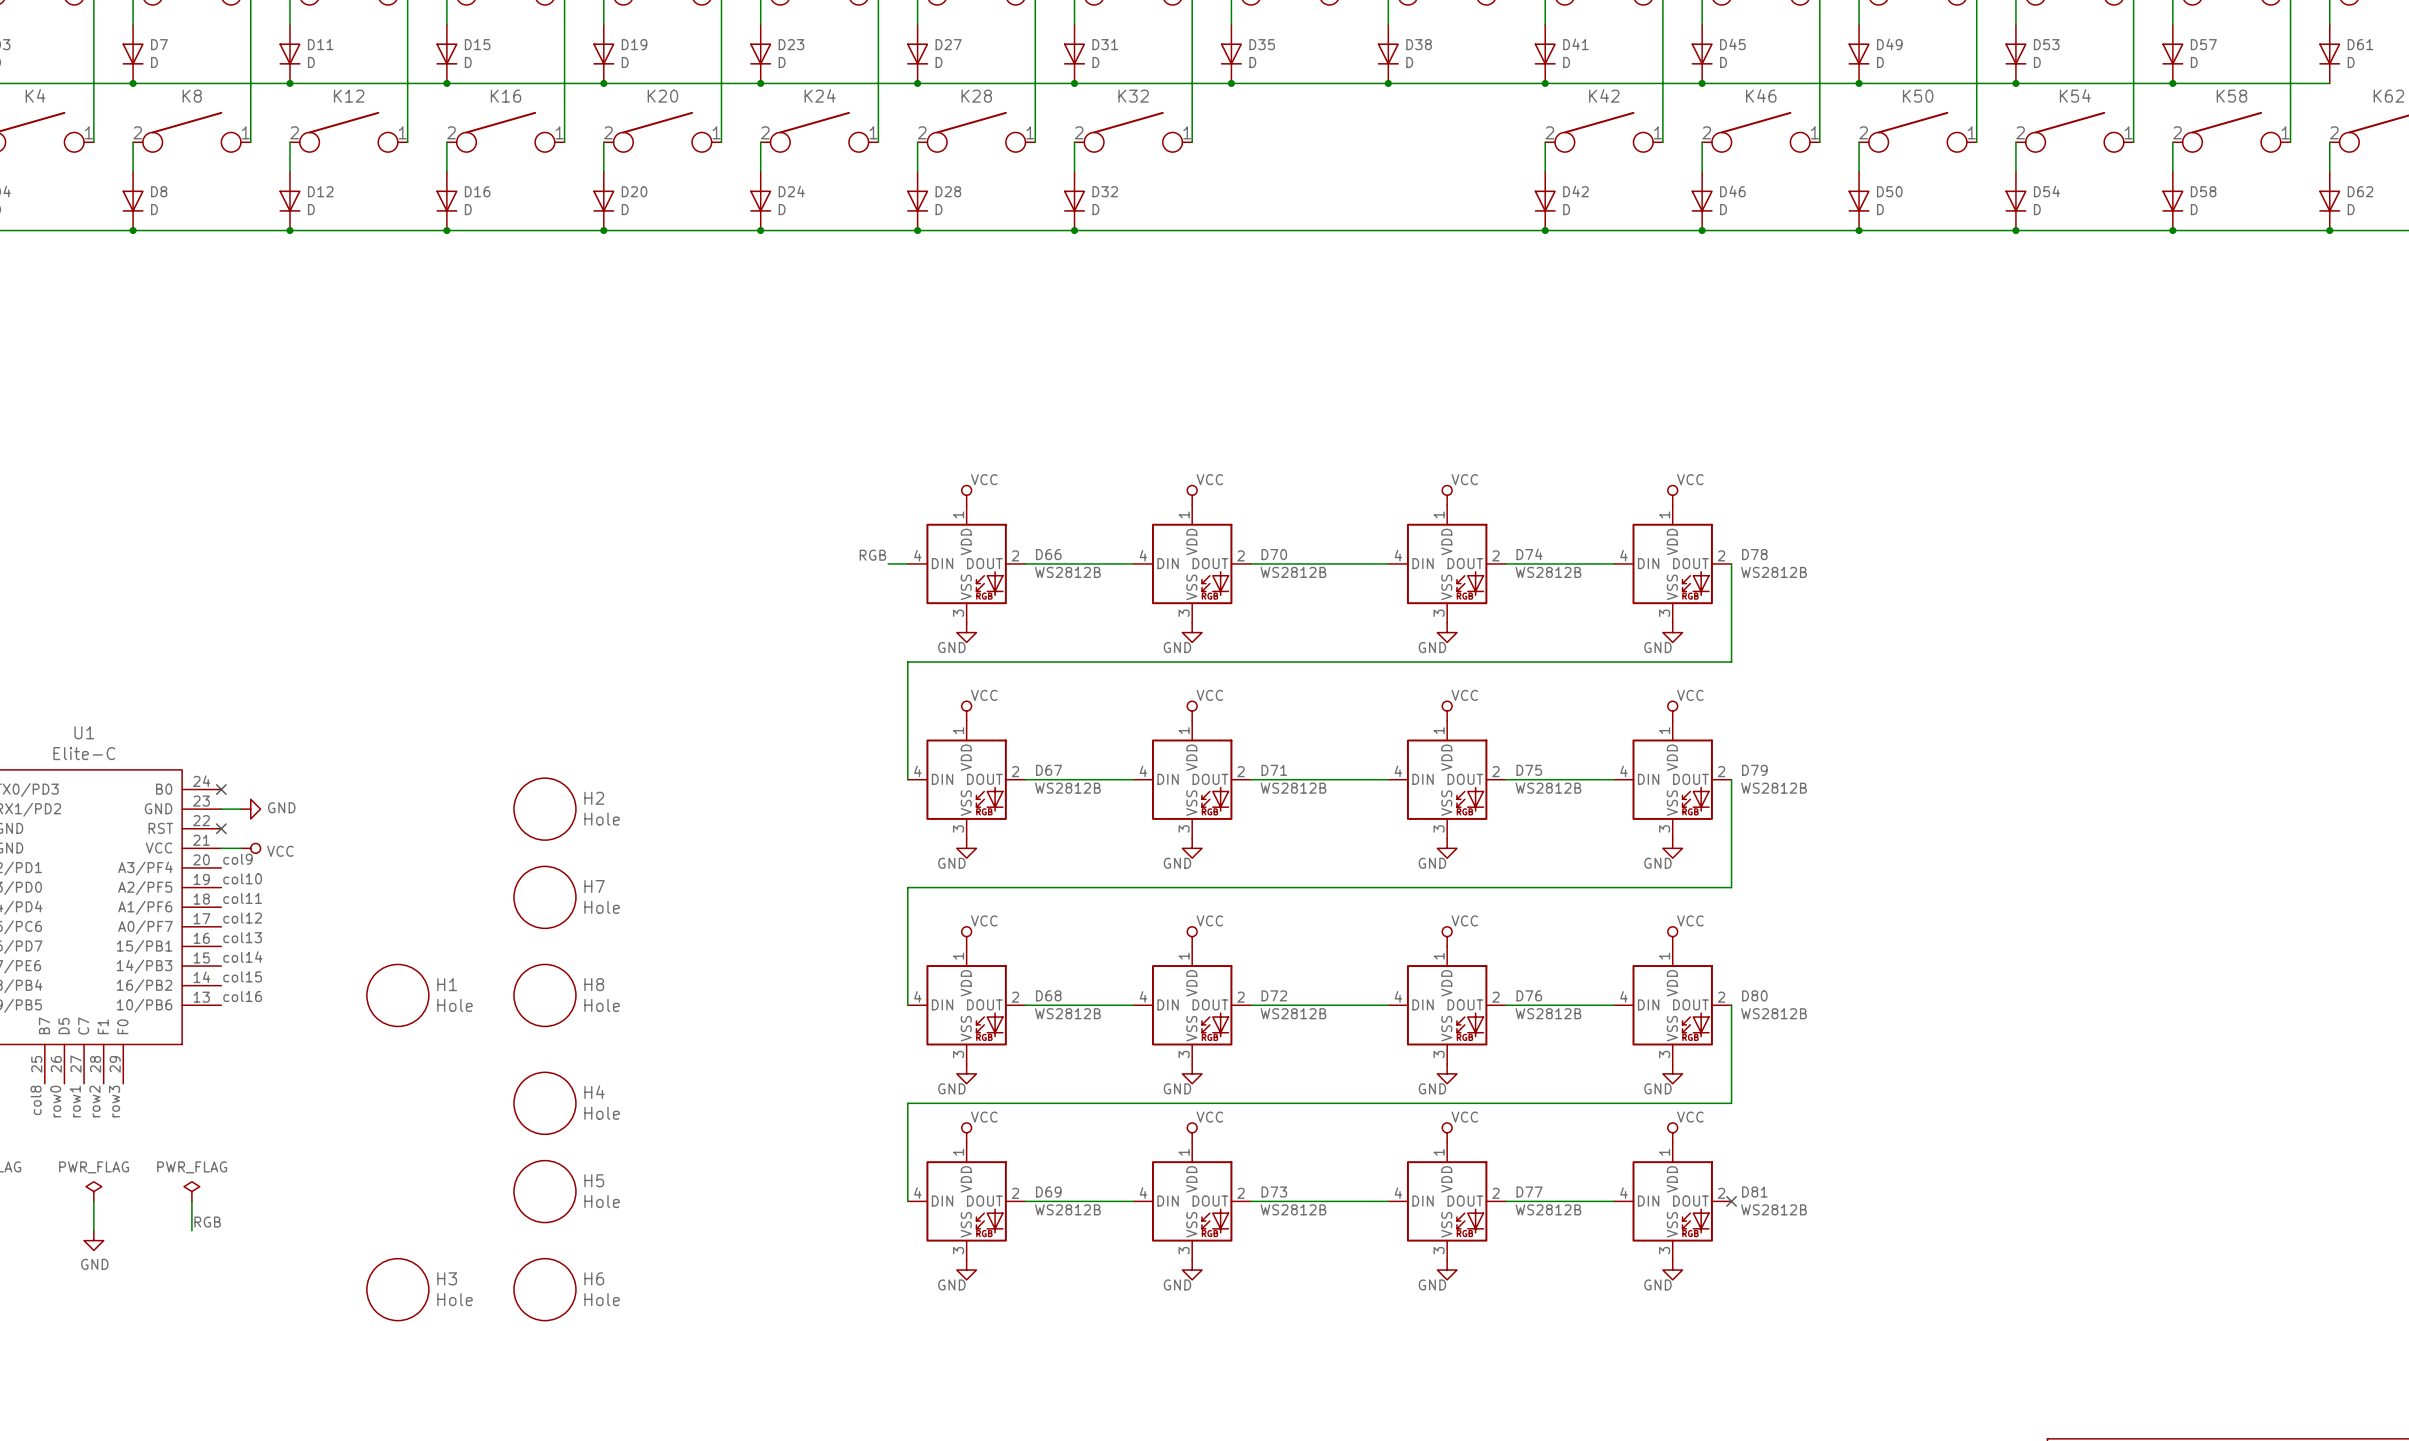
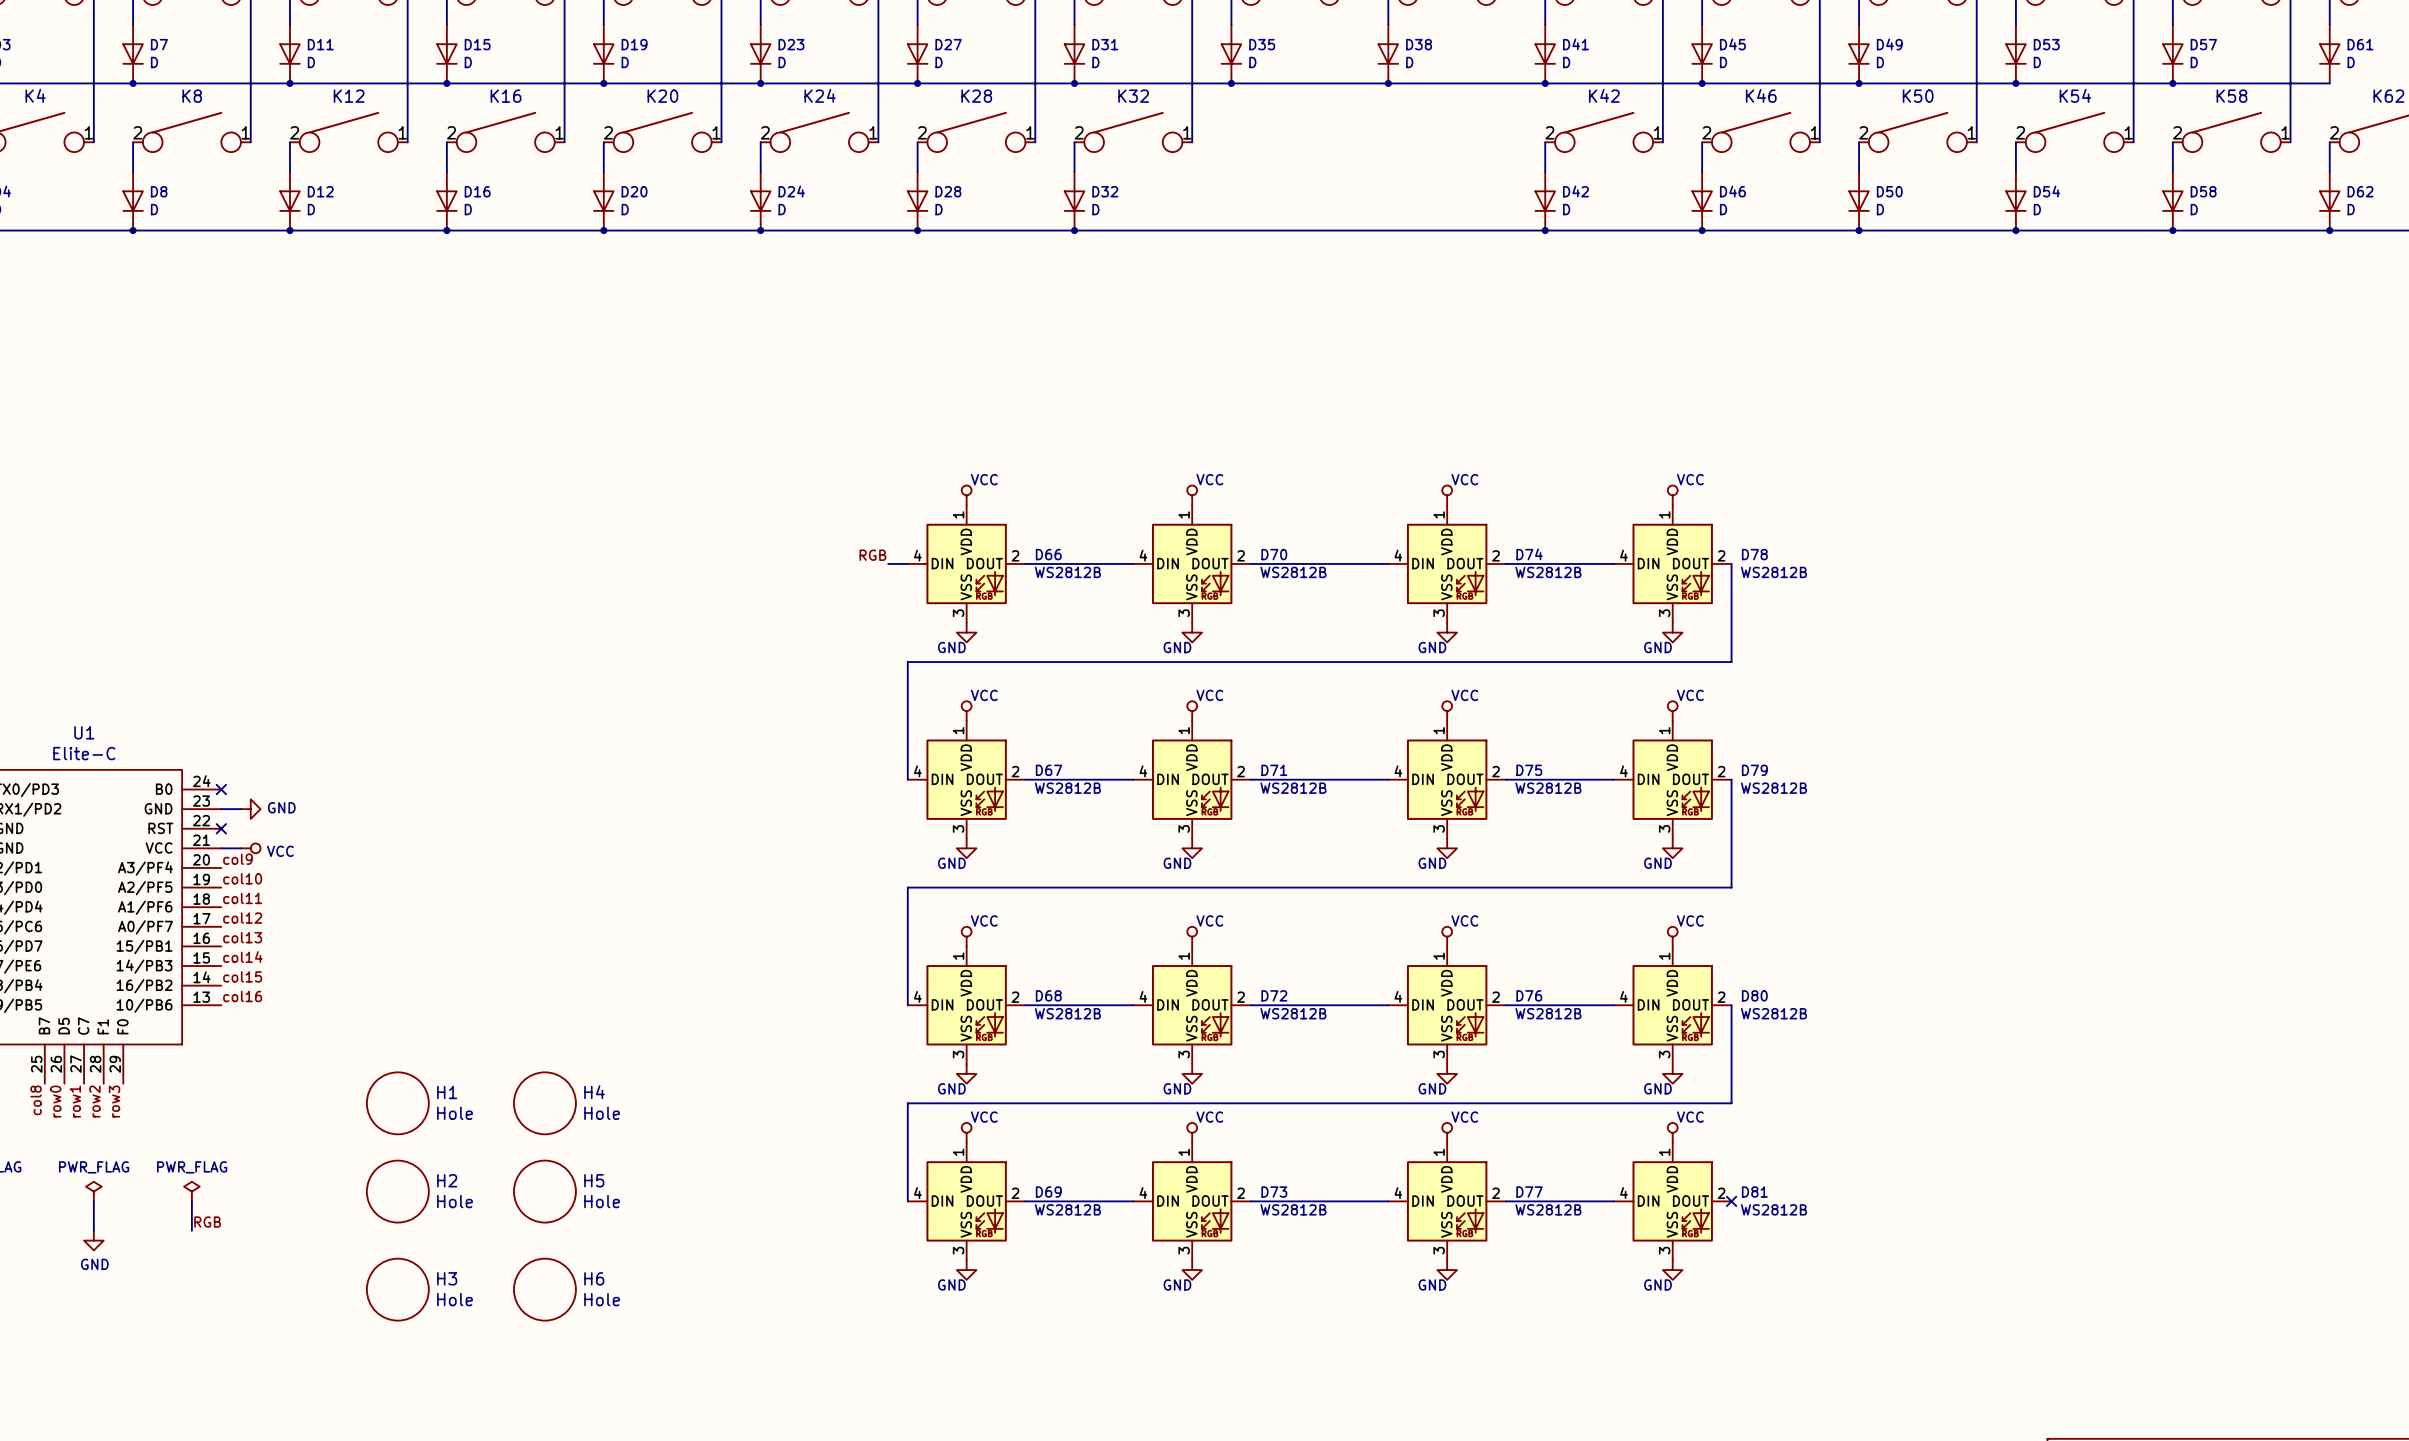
H2 position: (544, 809) -> (397, 1191)
H7: Hole (544, 897) -> none
H1 position: (397, 995) -> (397, 1103)
H8: Hole (544, 995) -> none

